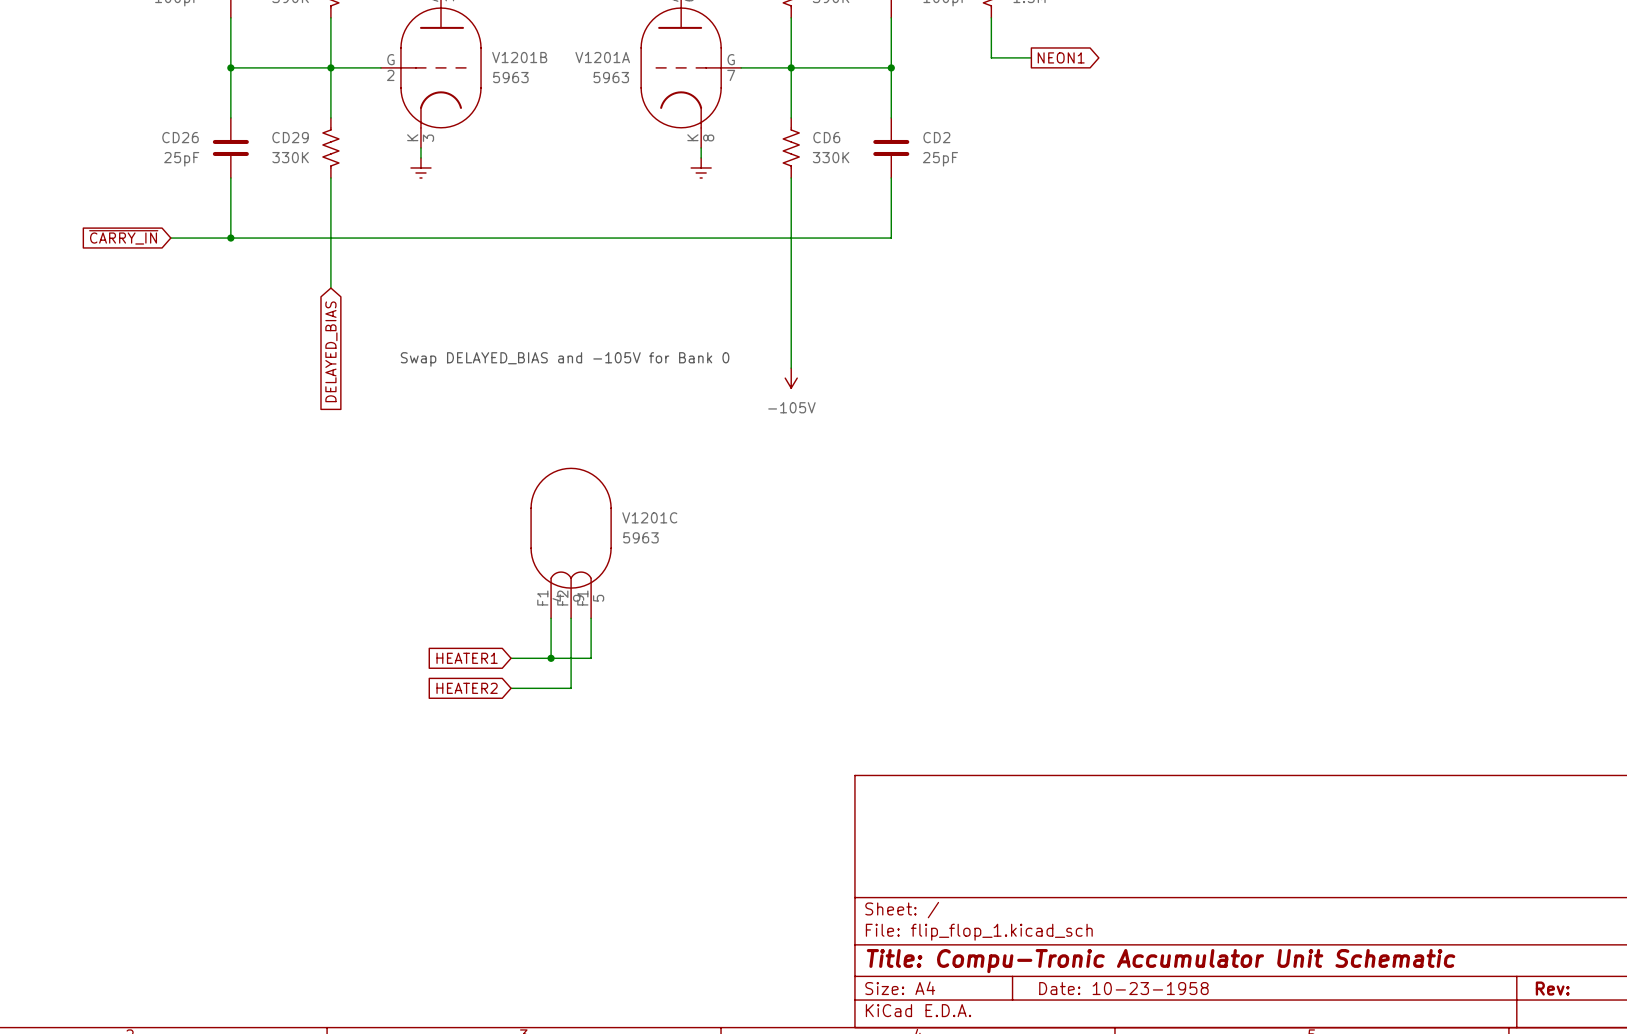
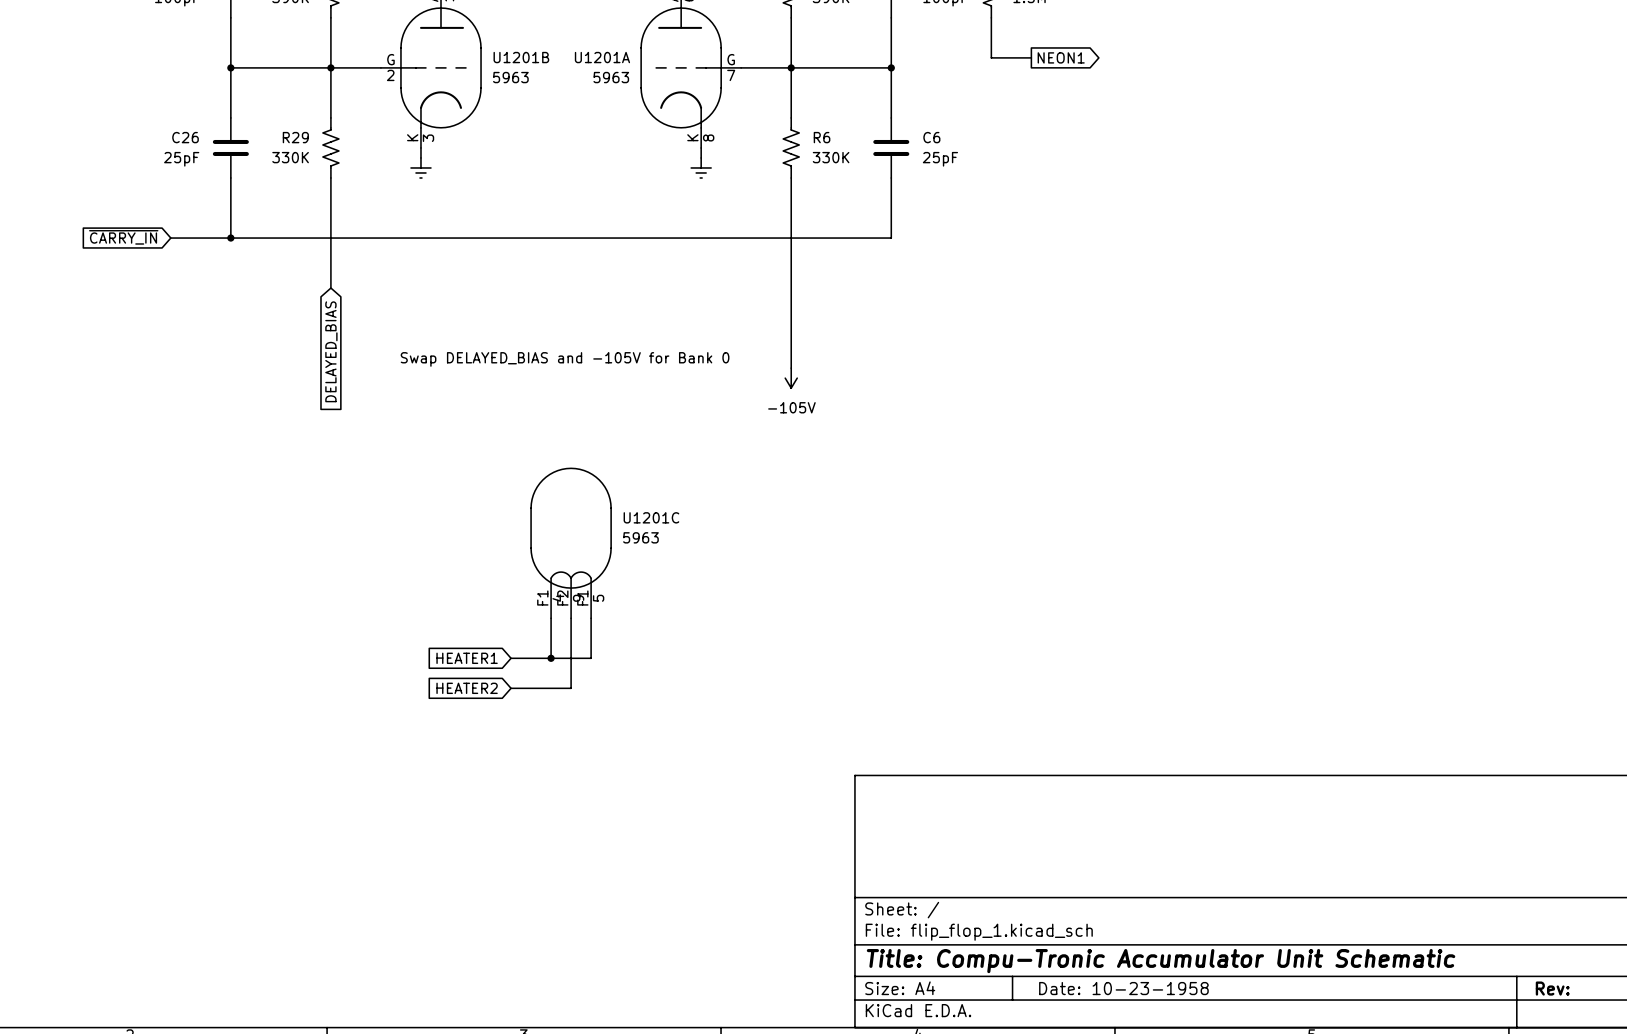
V1201B name: V1201B (519, 57) -> U1201B (521, 57)
V1201A name: V1201A (602, 57) -> U1201A (602, 57)
CD26 name: CD26 (180, 137) -> C26 (185, 137)
CD29 name: CD29 (290, 137) -> R29 (295, 137)
CD6 name: CD6 (826, 137) -> R6 (822, 137)
CD2 name: CD2 (936, 137) -> C6 (931, 137)
V1201C name: V1201C (649, 517) -> U1201C (651, 517)

